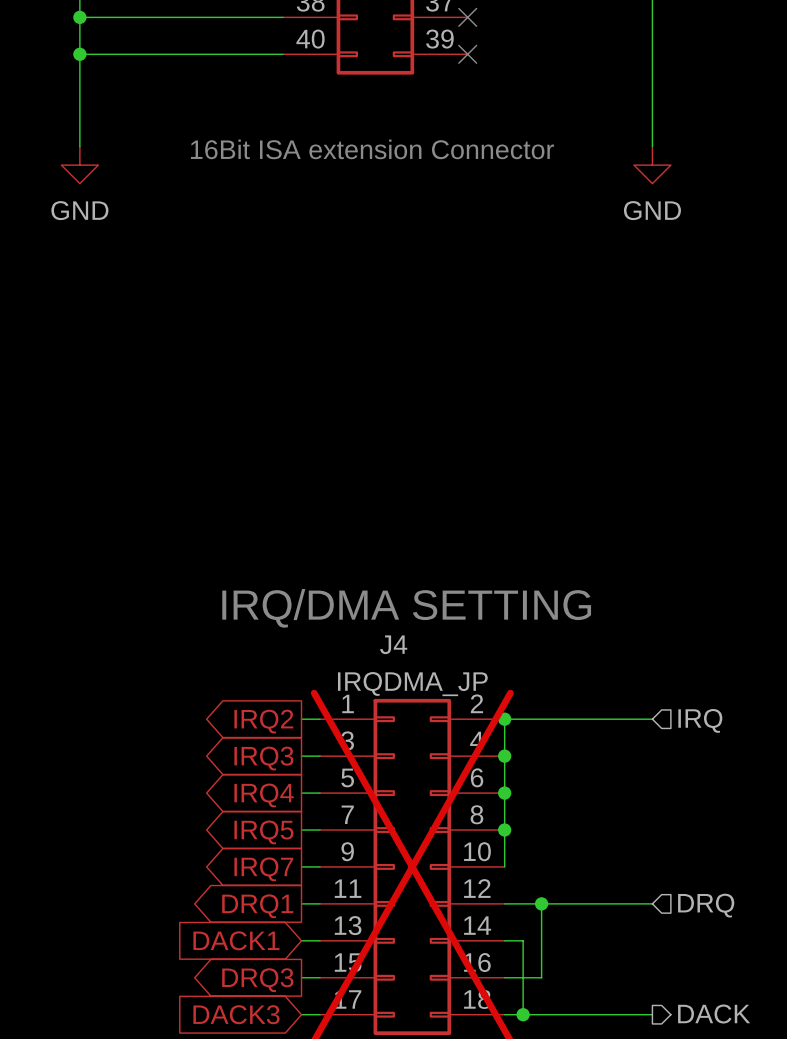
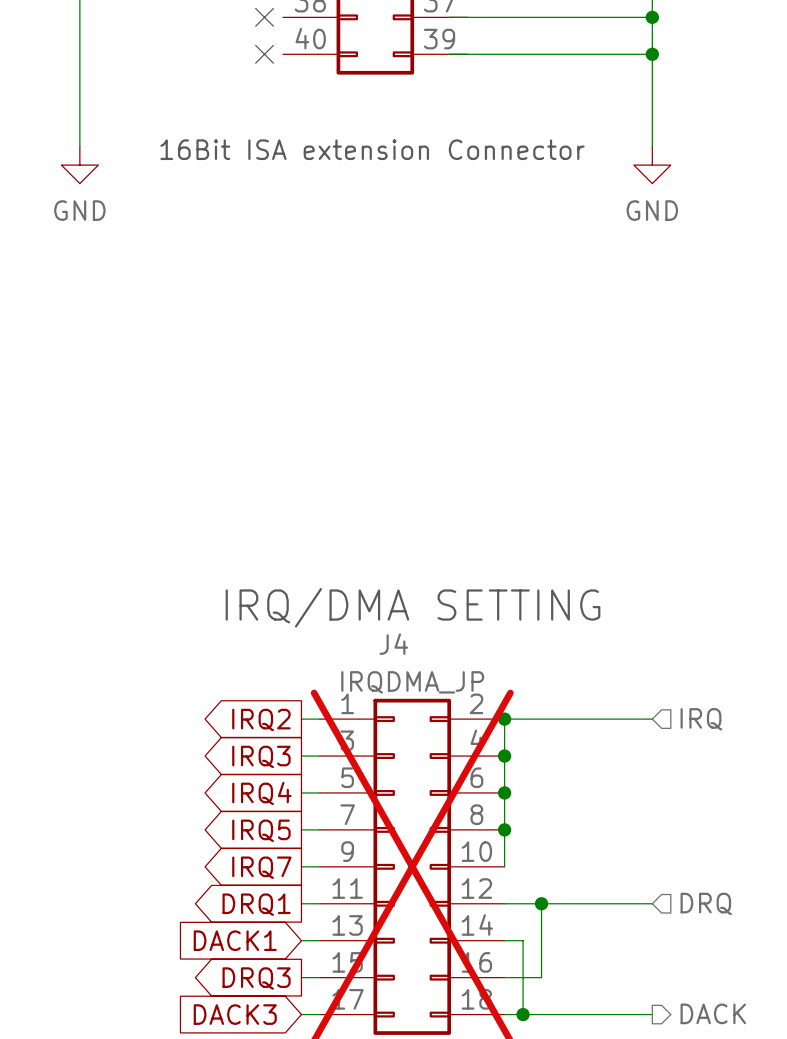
wire: (79, 17) (283, 17) -> none
junction: (79, 17) -> none
no-connect mark: none -> (264, 17)
wire: none -> (449, 17) (652, 17)
no-connect mark: (467, 17) -> none
junction: none -> (652, 17)
wire: (79, 54) (283, 54) -> none
junction: (79, 54) -> none
no-connect mark: none -> (264, 54)
wire: none -> (449, 54) (652, 54)
no-connect mark: (467, 54) -> none
junction: none -> (652, 54)

